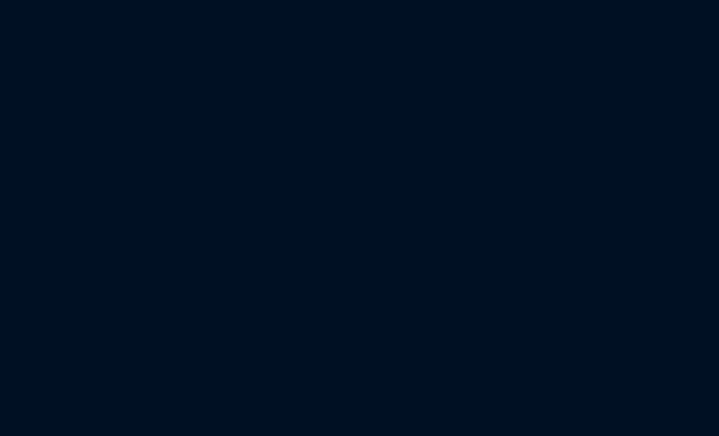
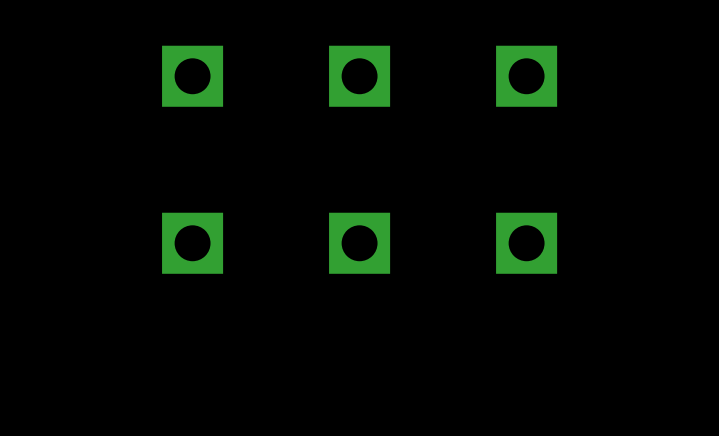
part: none -> (192, 76)
part: none -> (359, 76)
part: none -> (526, 76)
part: none -> (192, 243)
part: none -> (359, 243)
part: none -> (526, 243)

